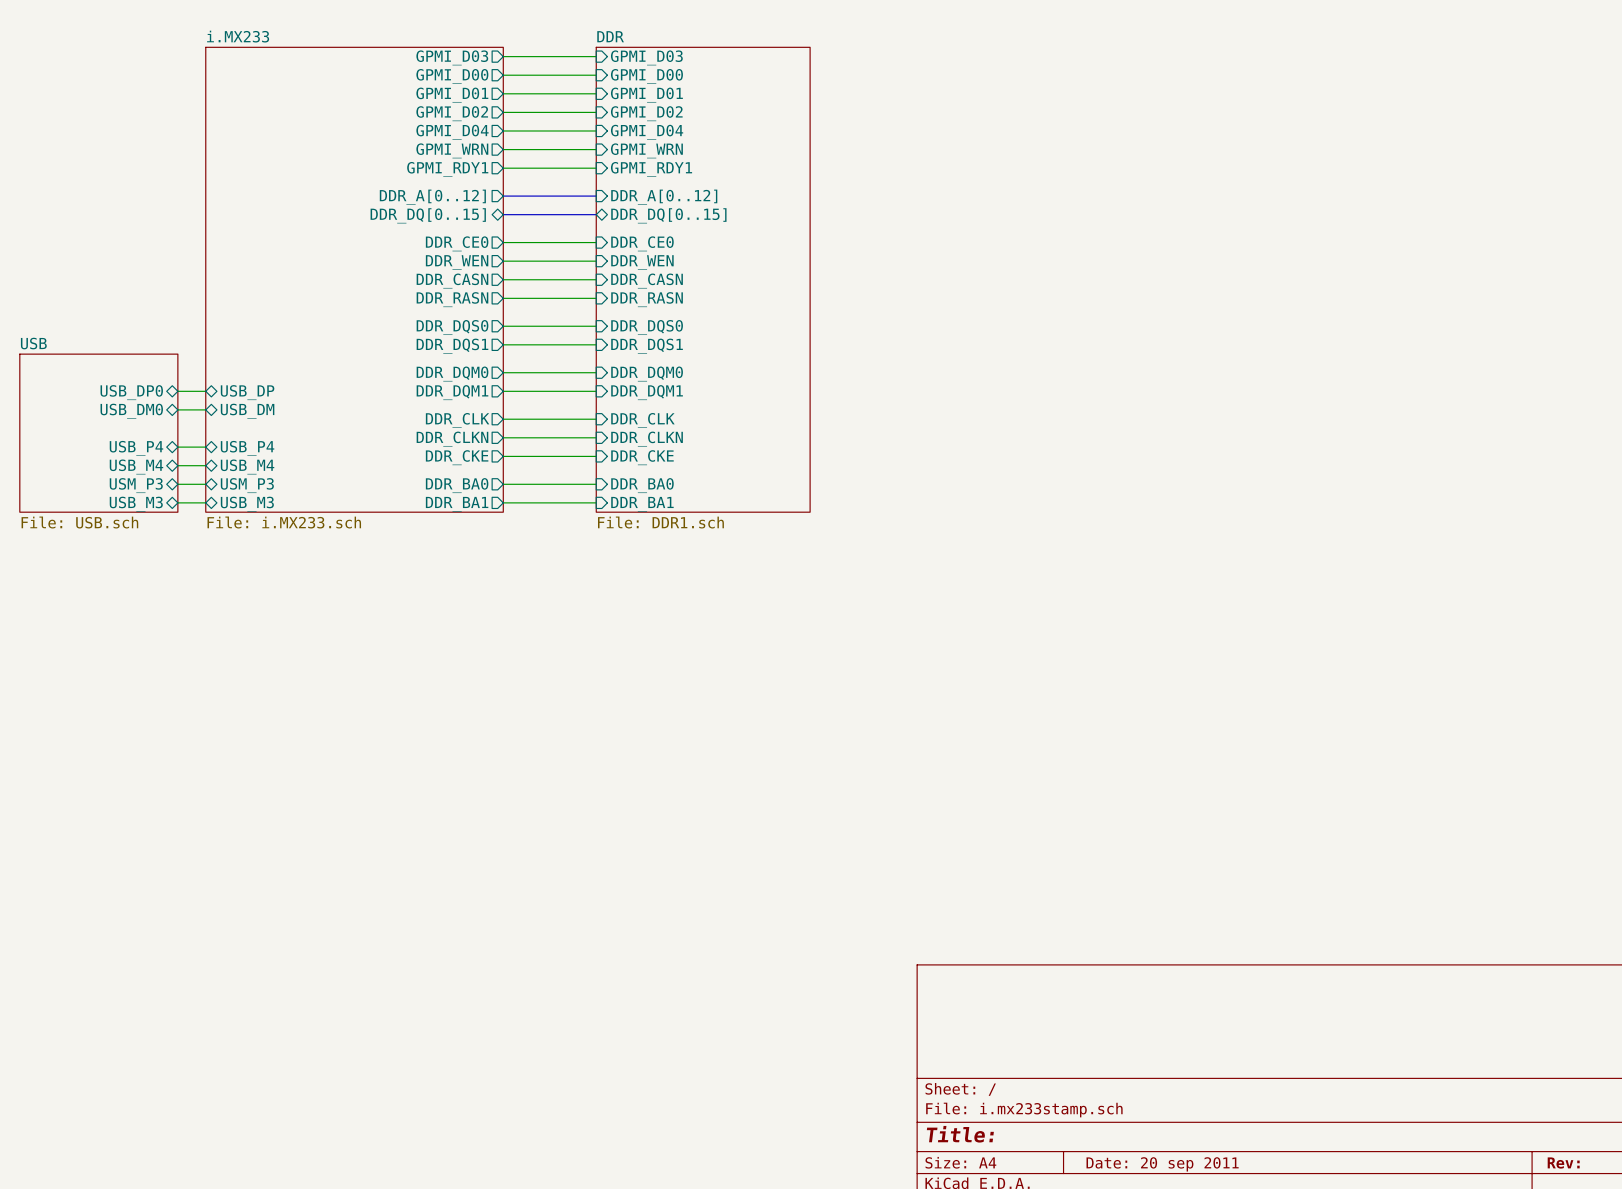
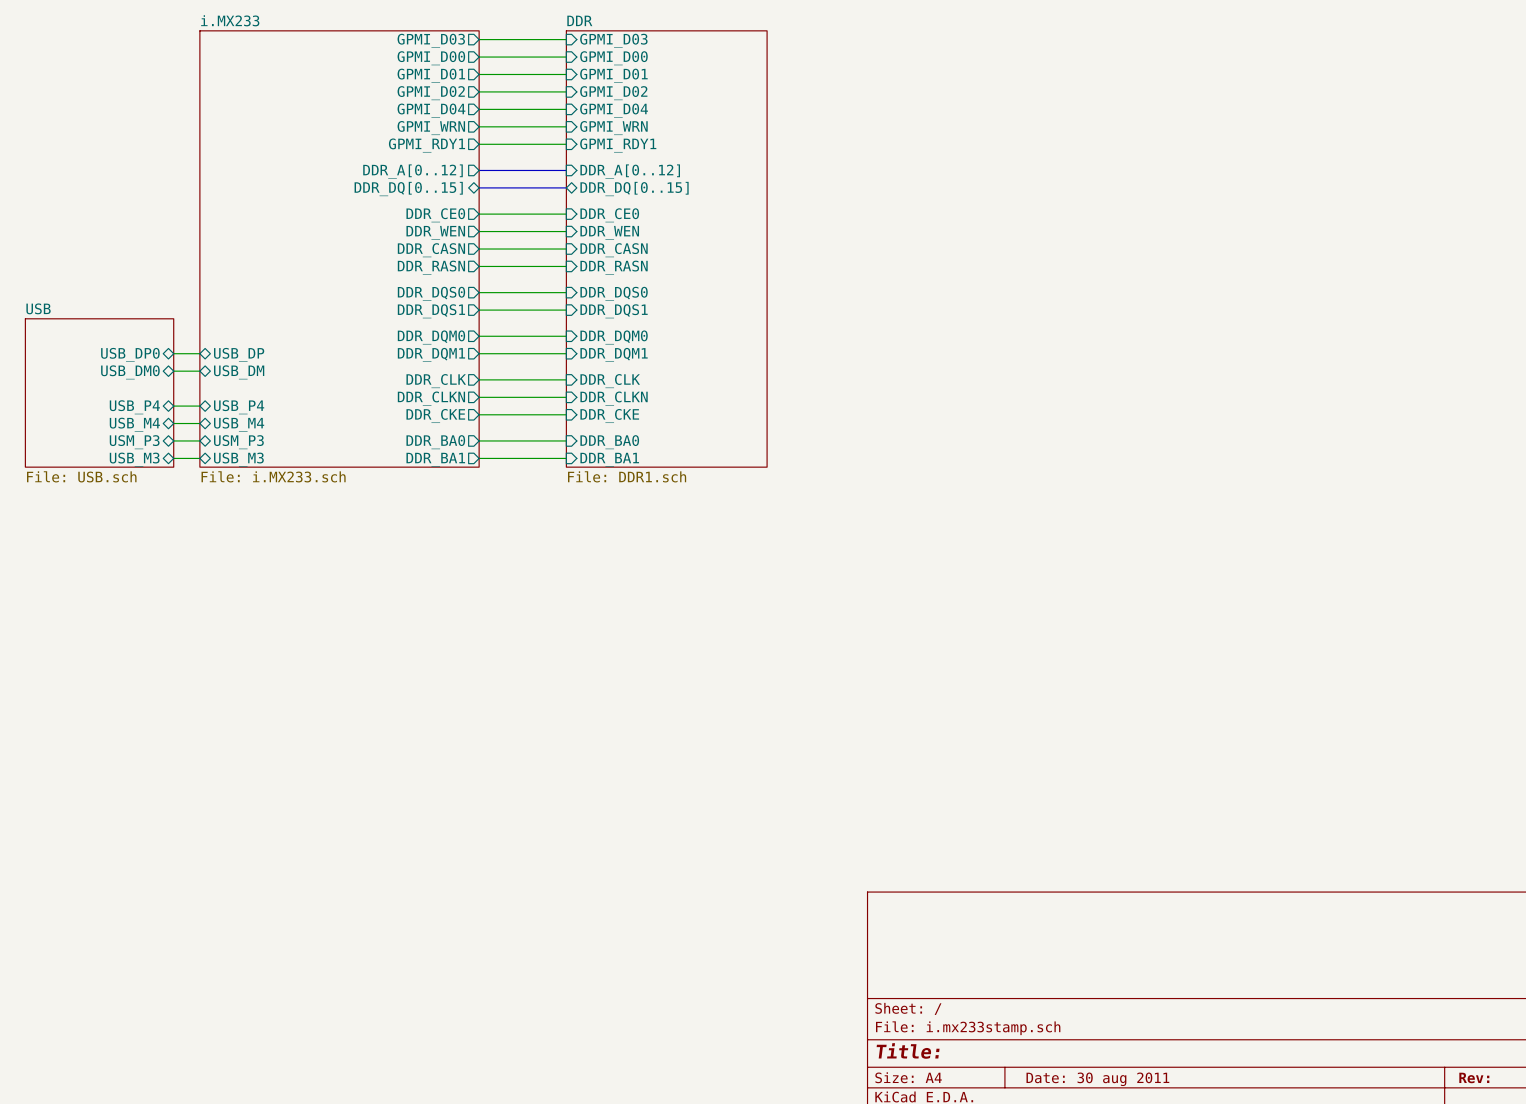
title block: Date: 20 sep 2011 (1162, 1164) -> Date: 30 aug 2011 (1097, 1079)

